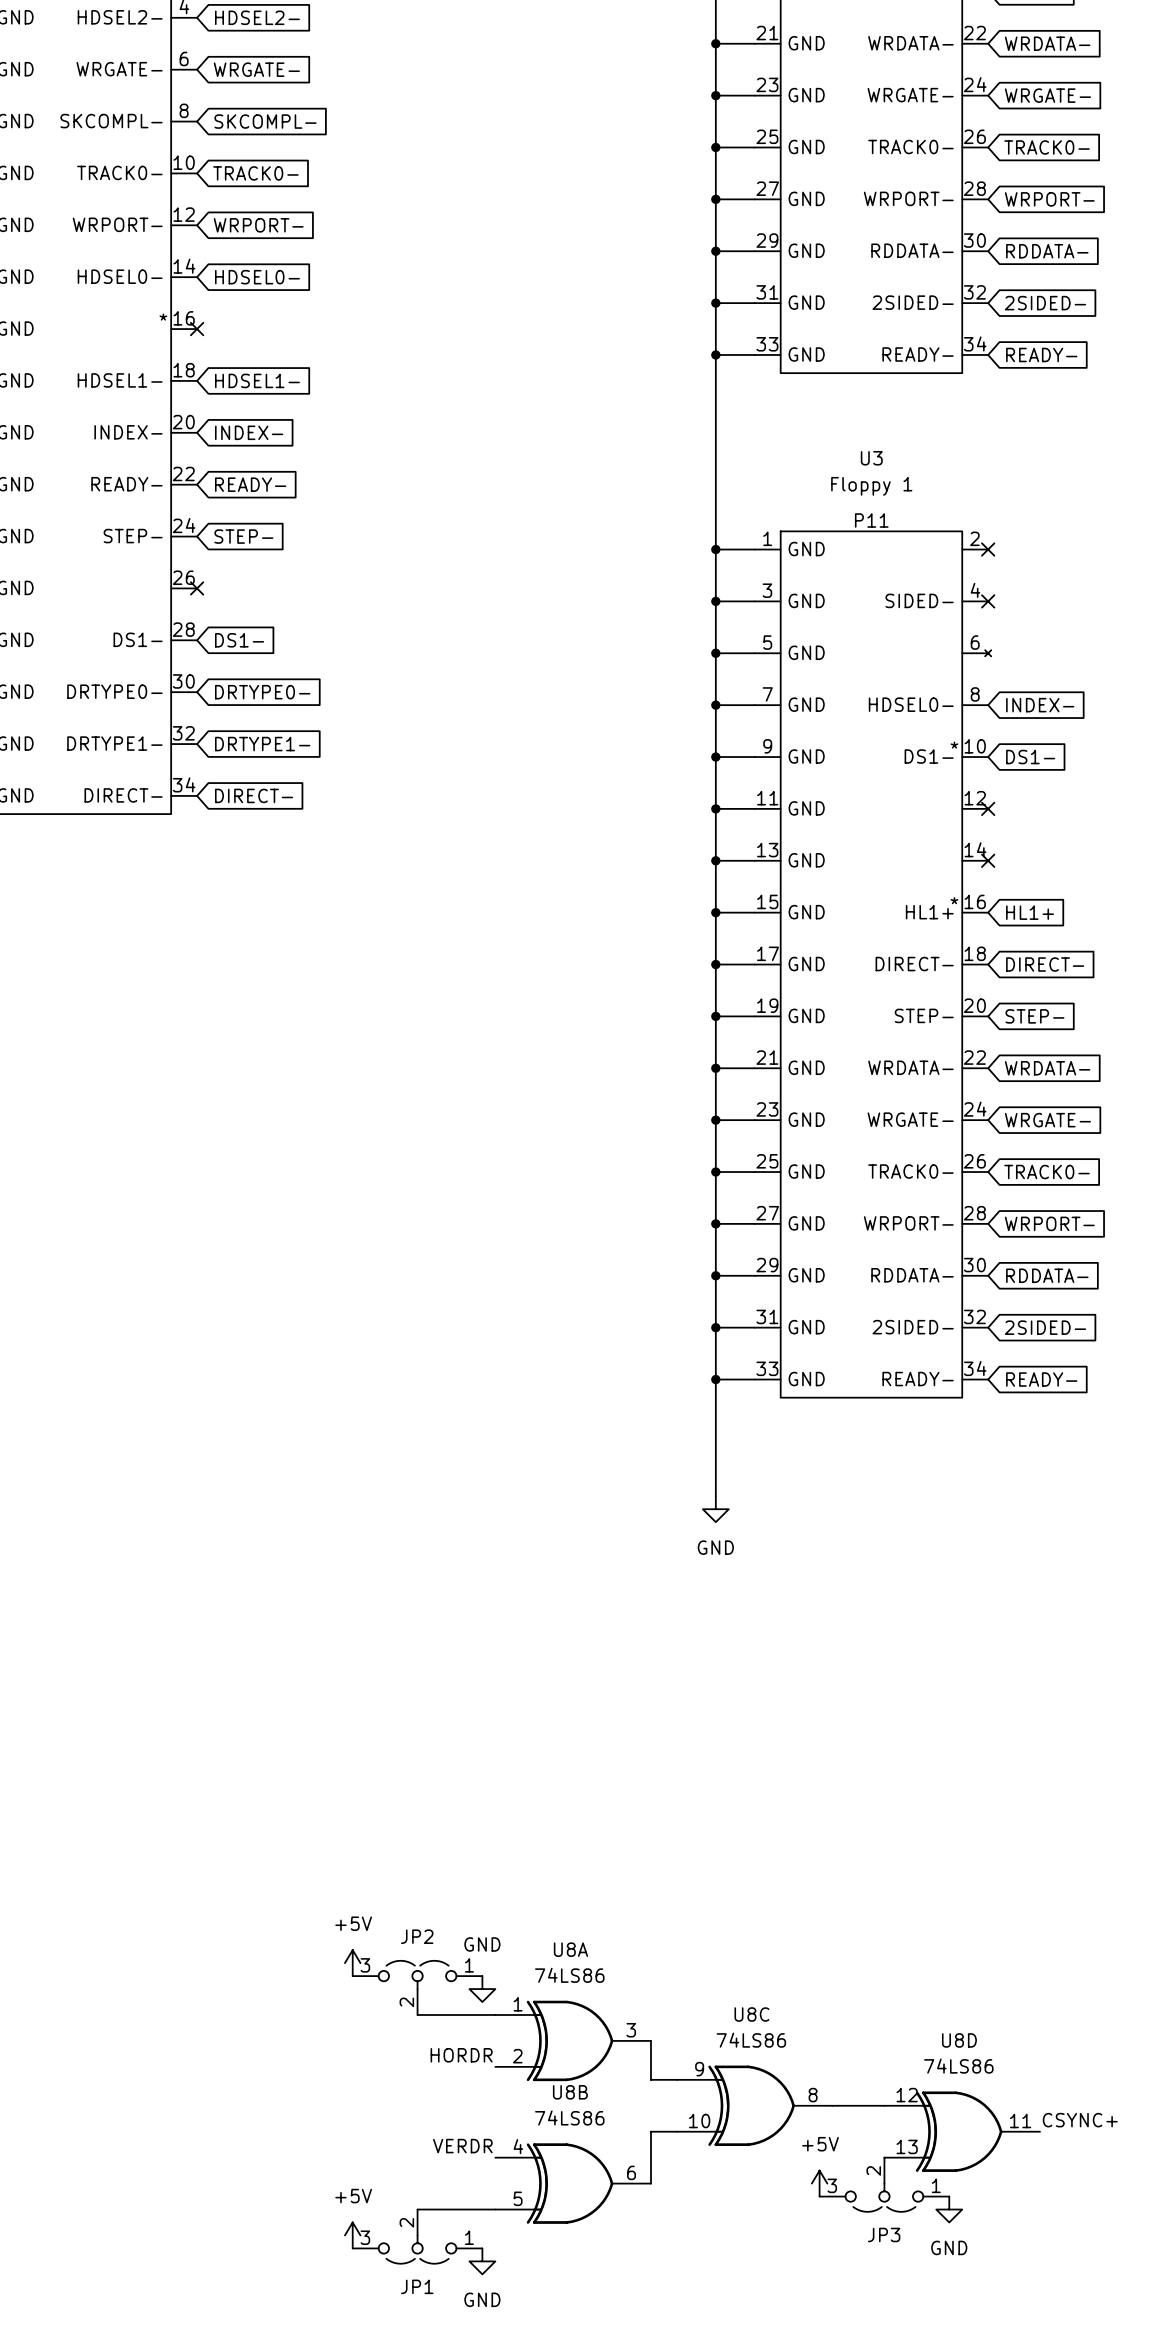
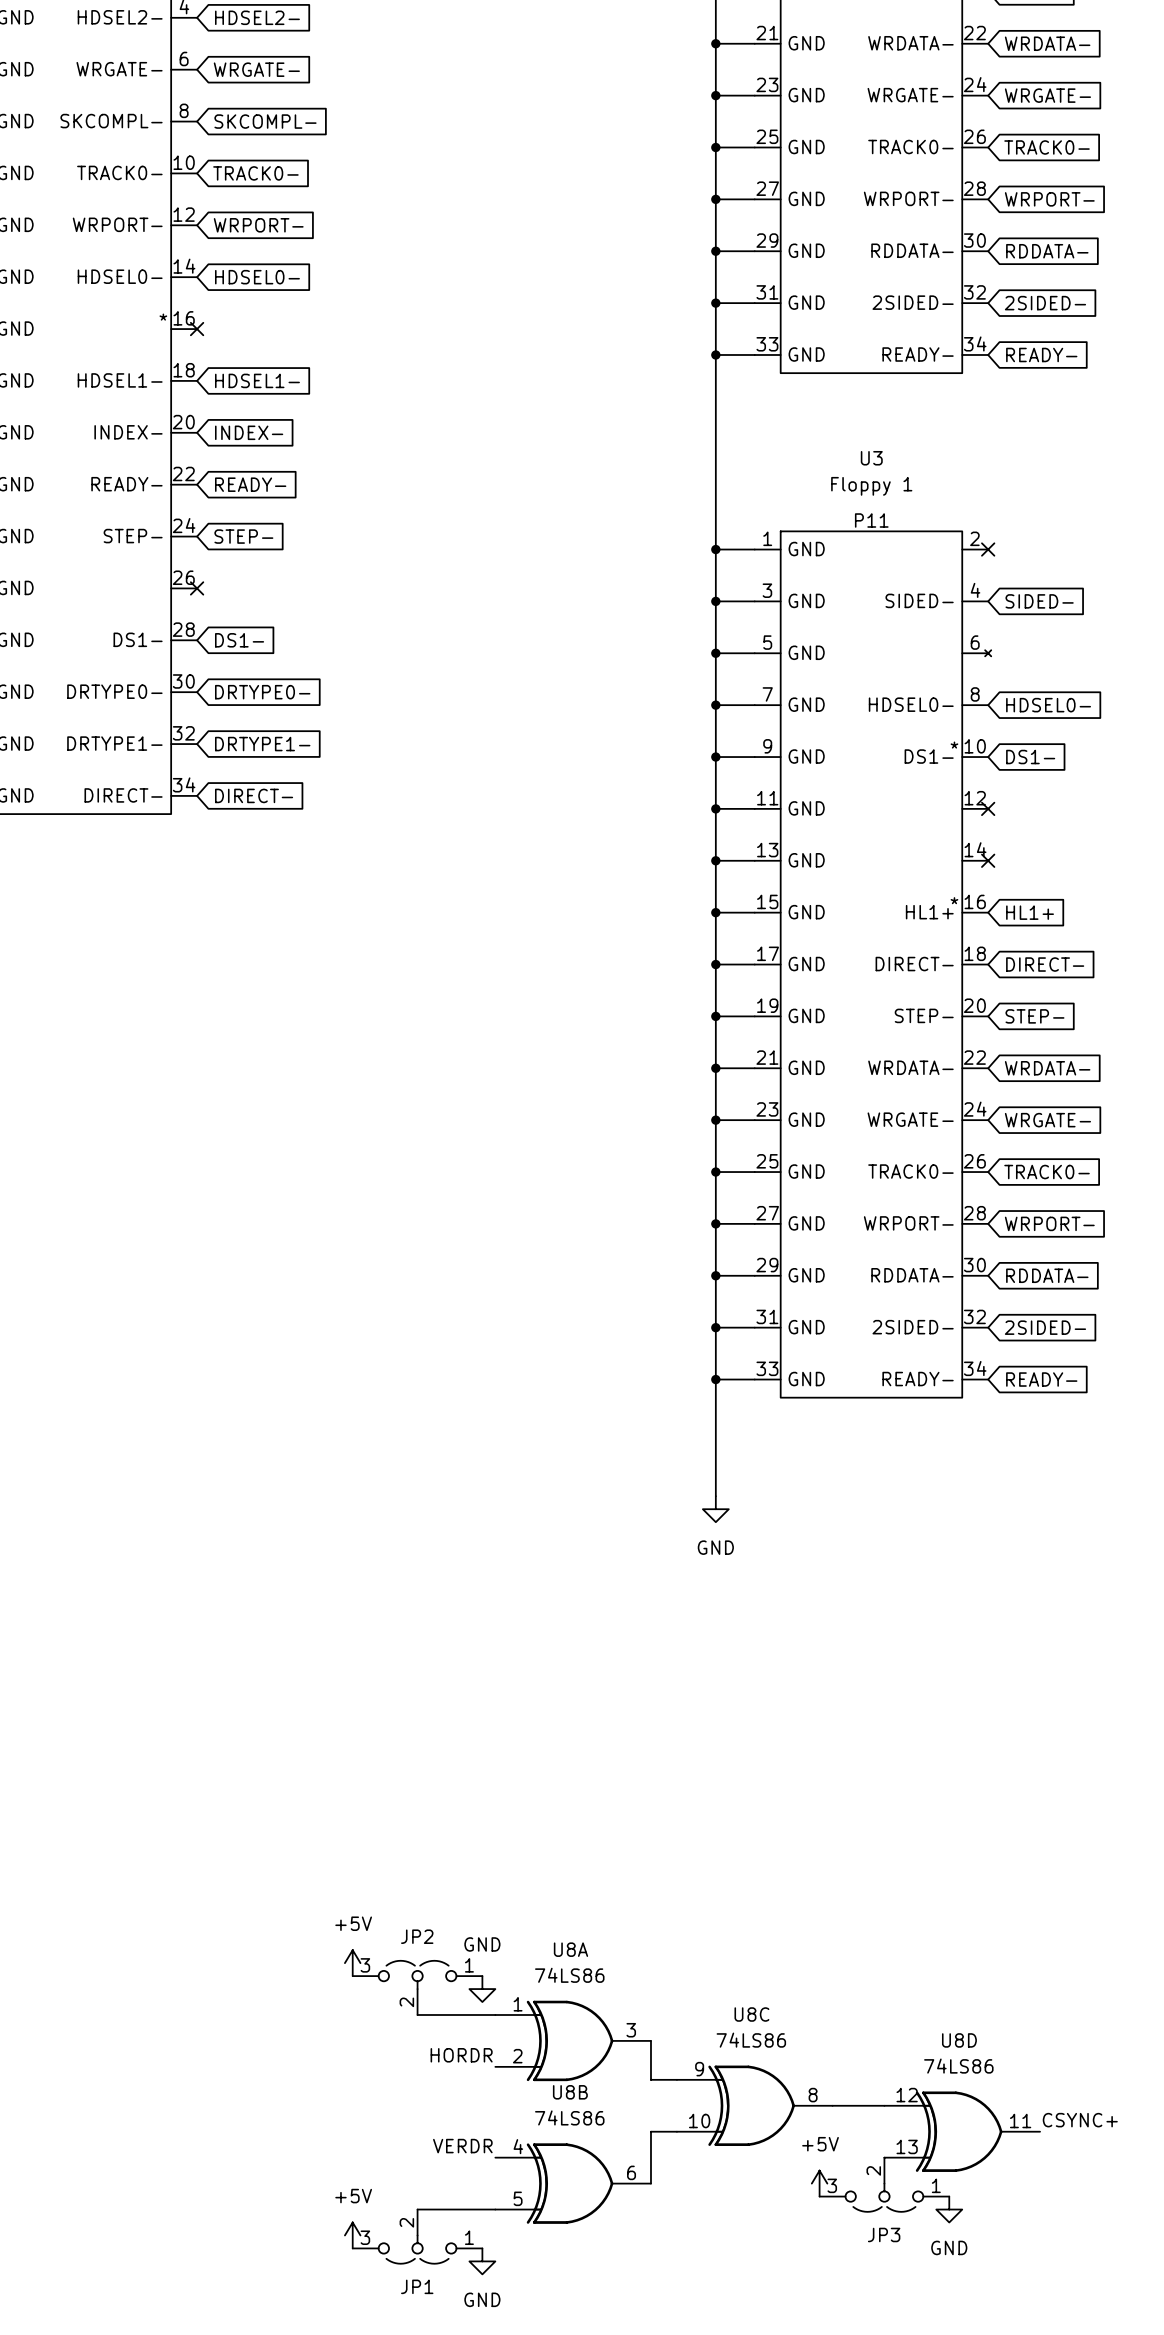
no-connect mark: (988, 601) -> none
global label: none -> SIDED- (1039, 601)
global label: INDEX- (1040, 705) -> HDSEL0- (1048, 705)

